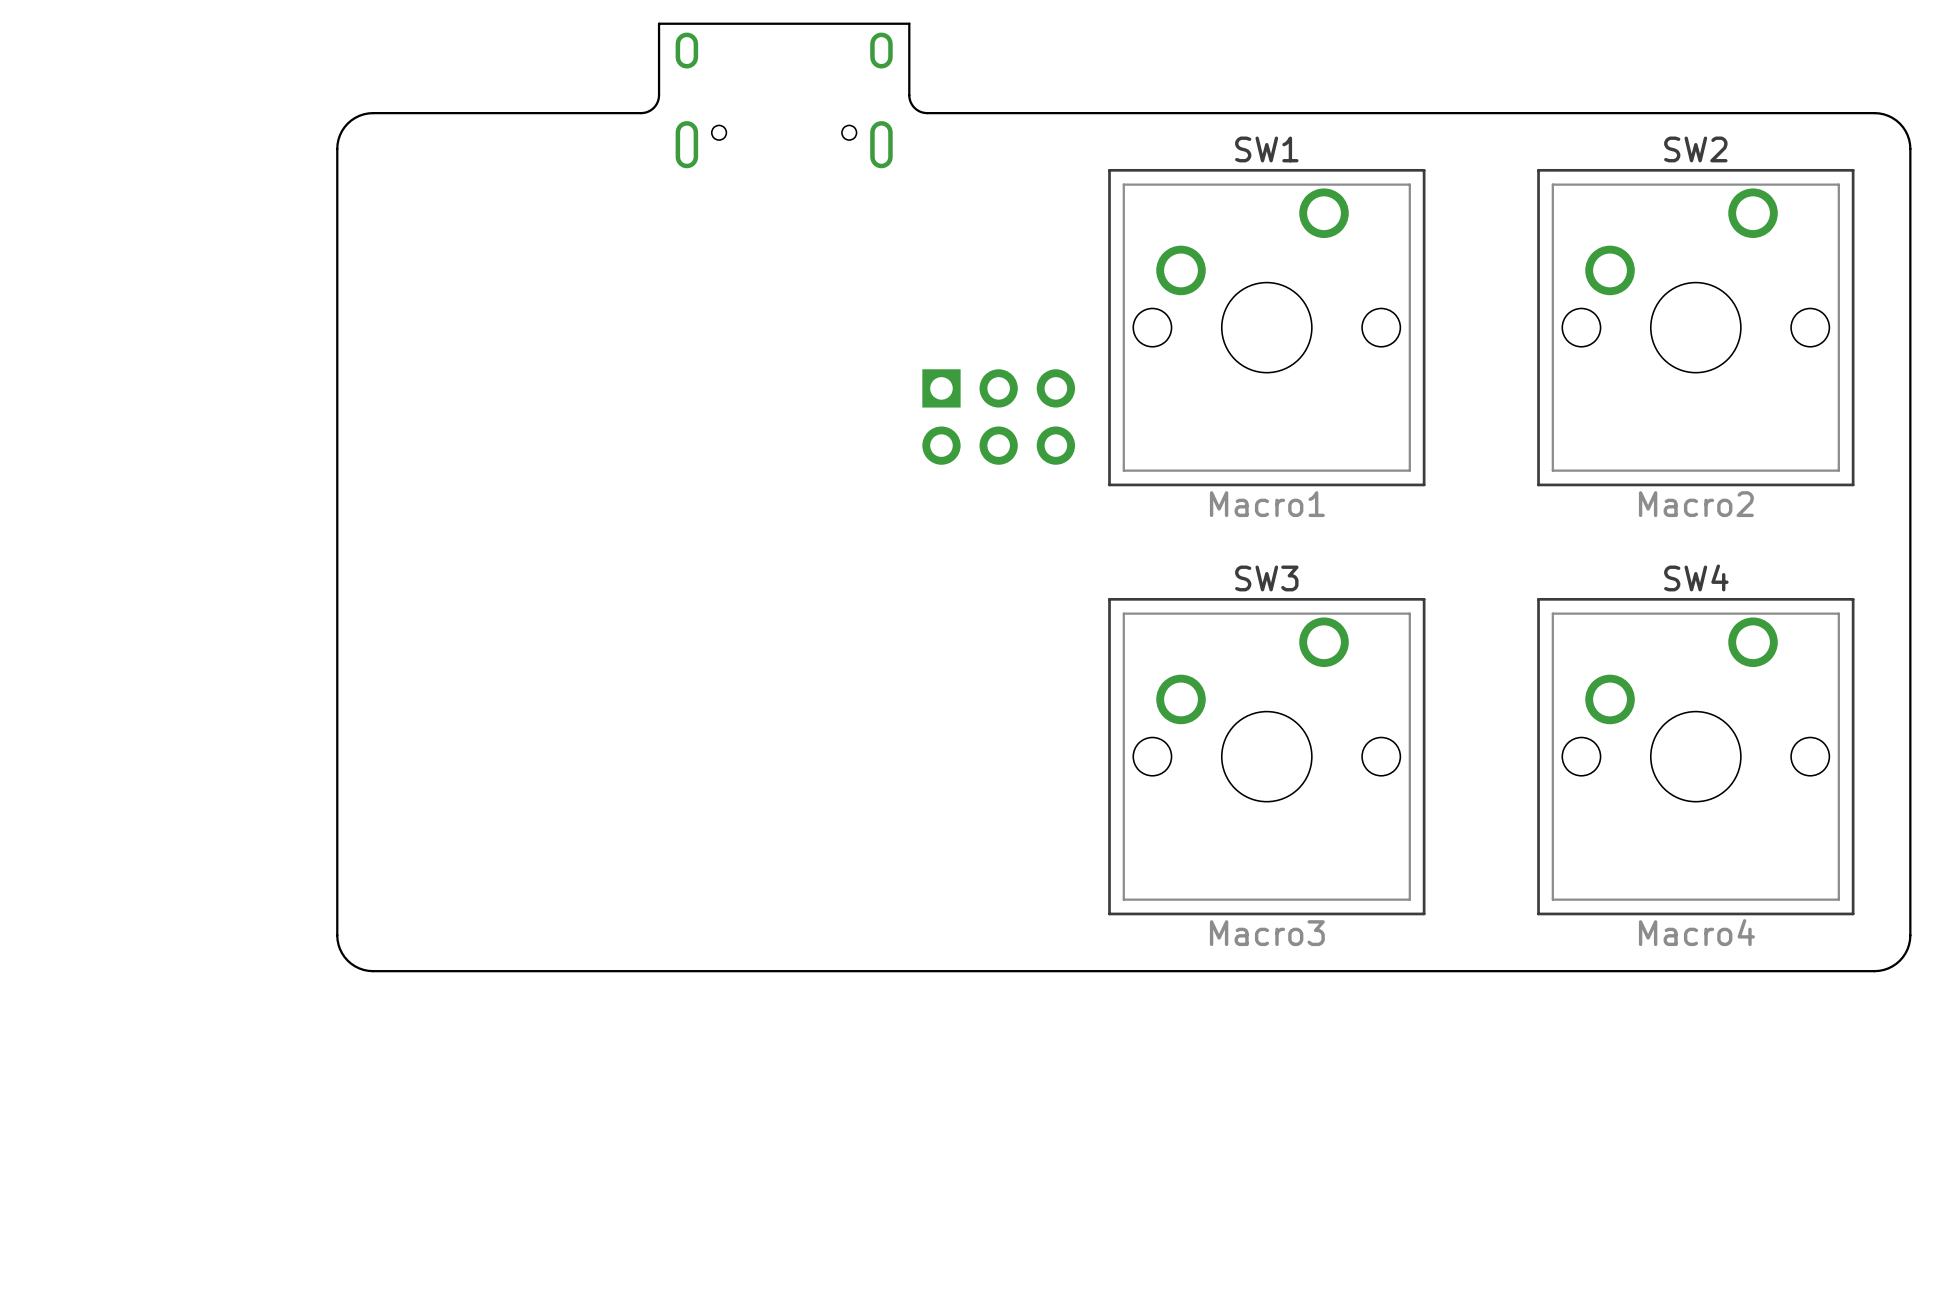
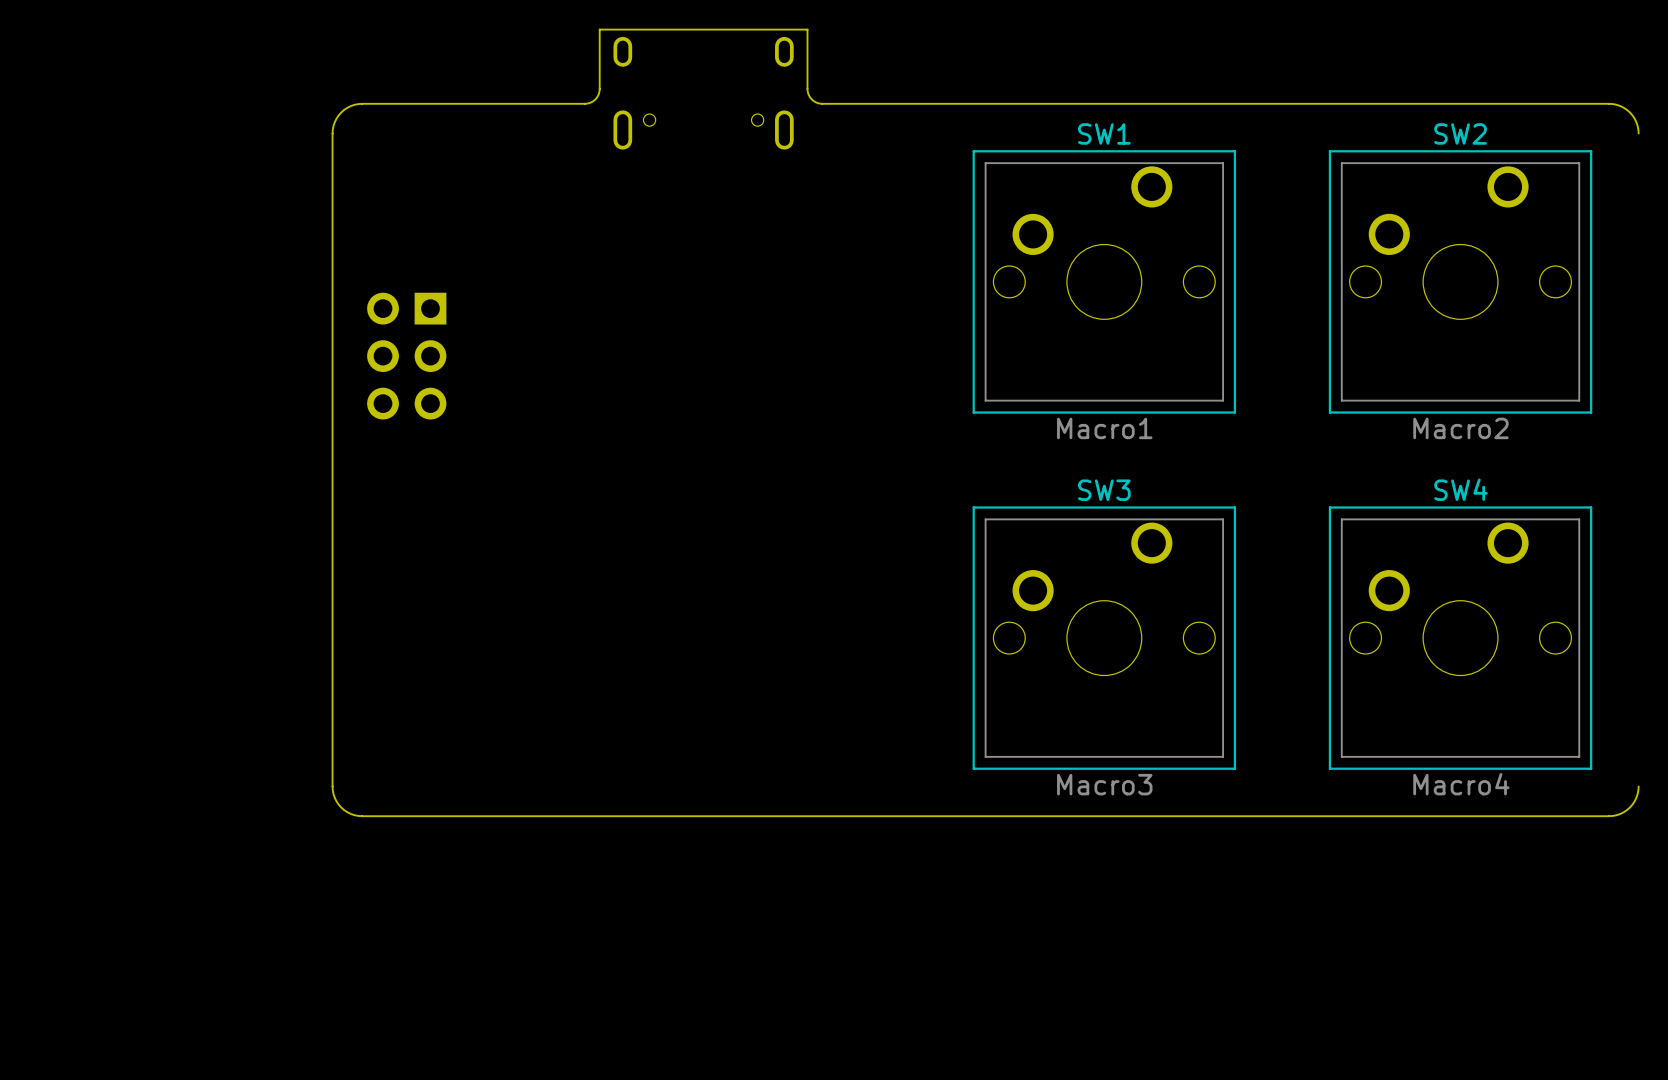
board edge: (1910, 148) (1910, 935) -> none
part: none -> (406, 356)
part: (998, 417) -> none

